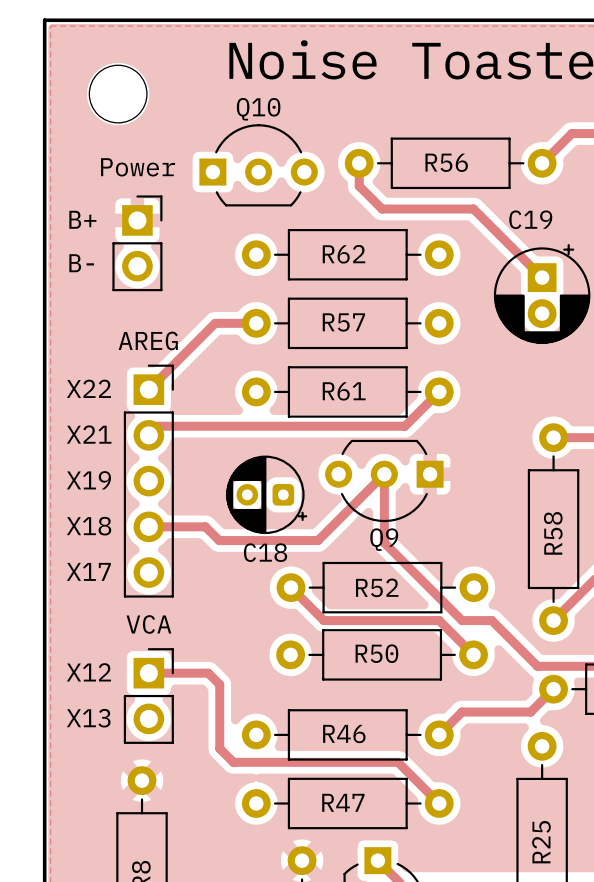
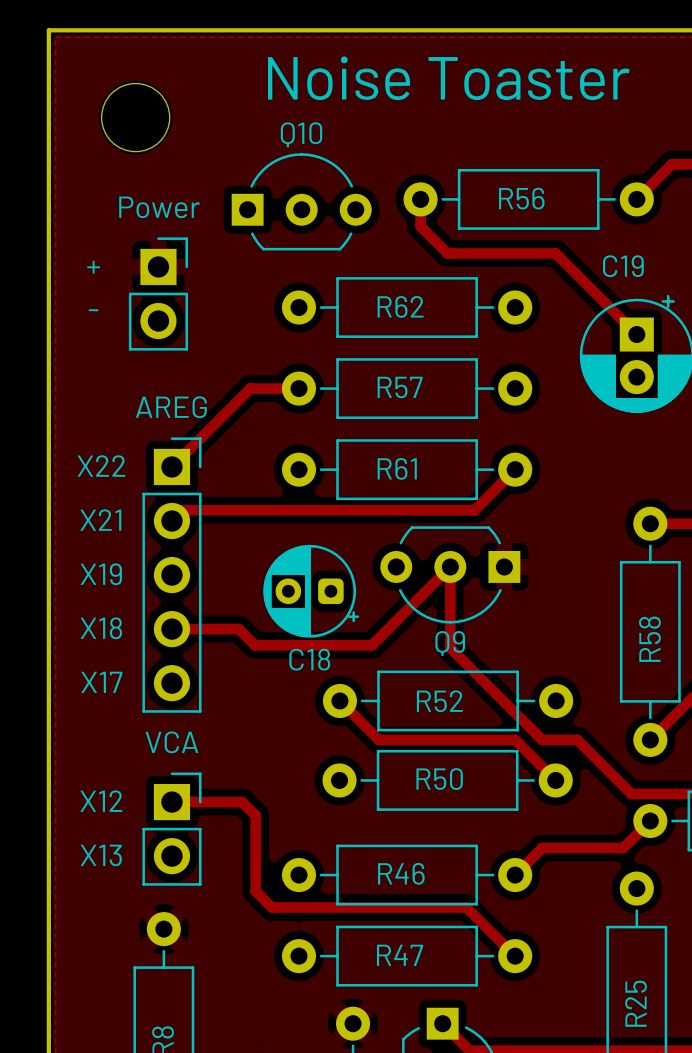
Power value: Power (138, 167) -> none
Power name: none -> Power (159, 207)
Power text: B+ (82, 219) -> + (93, 267)
Power text: none -> - (93, 310)
Power text: B- (81, 263) -> none
AREG name: none -> AREG (171, 407)
AREG value: AREG (148, 340) -> none
VCA name: none -> VCA (171, 742)
VCA value: VCA (148, 624) -> none

